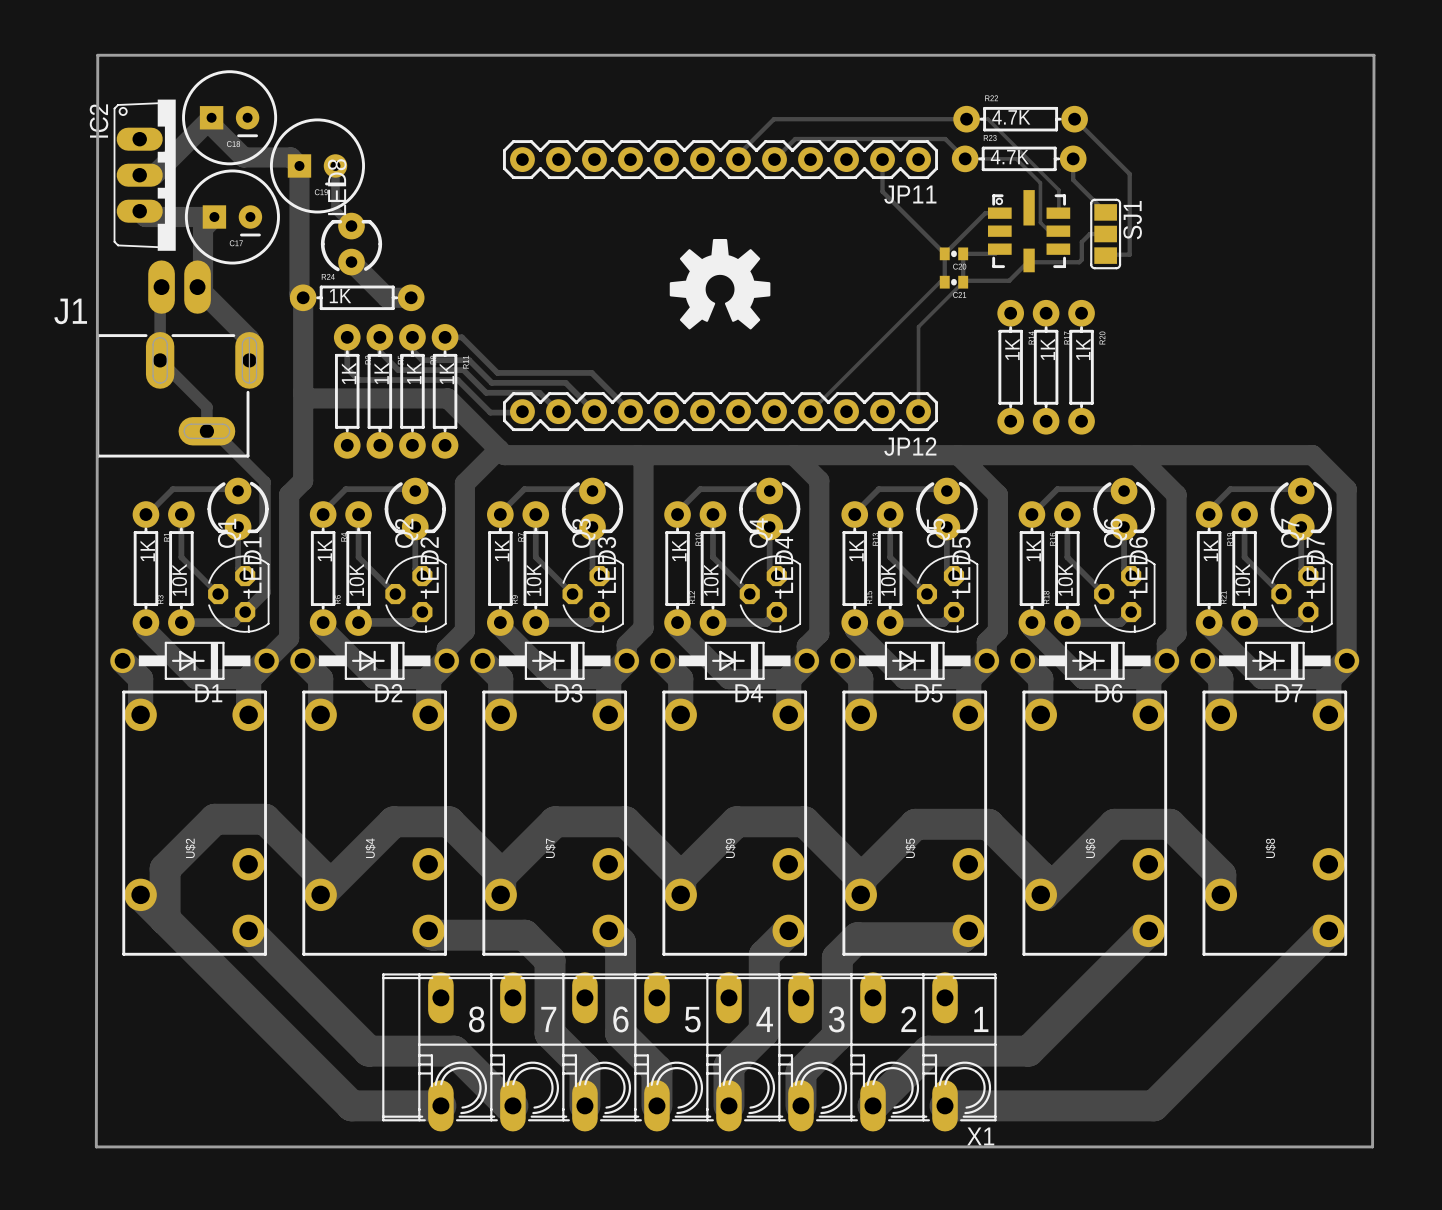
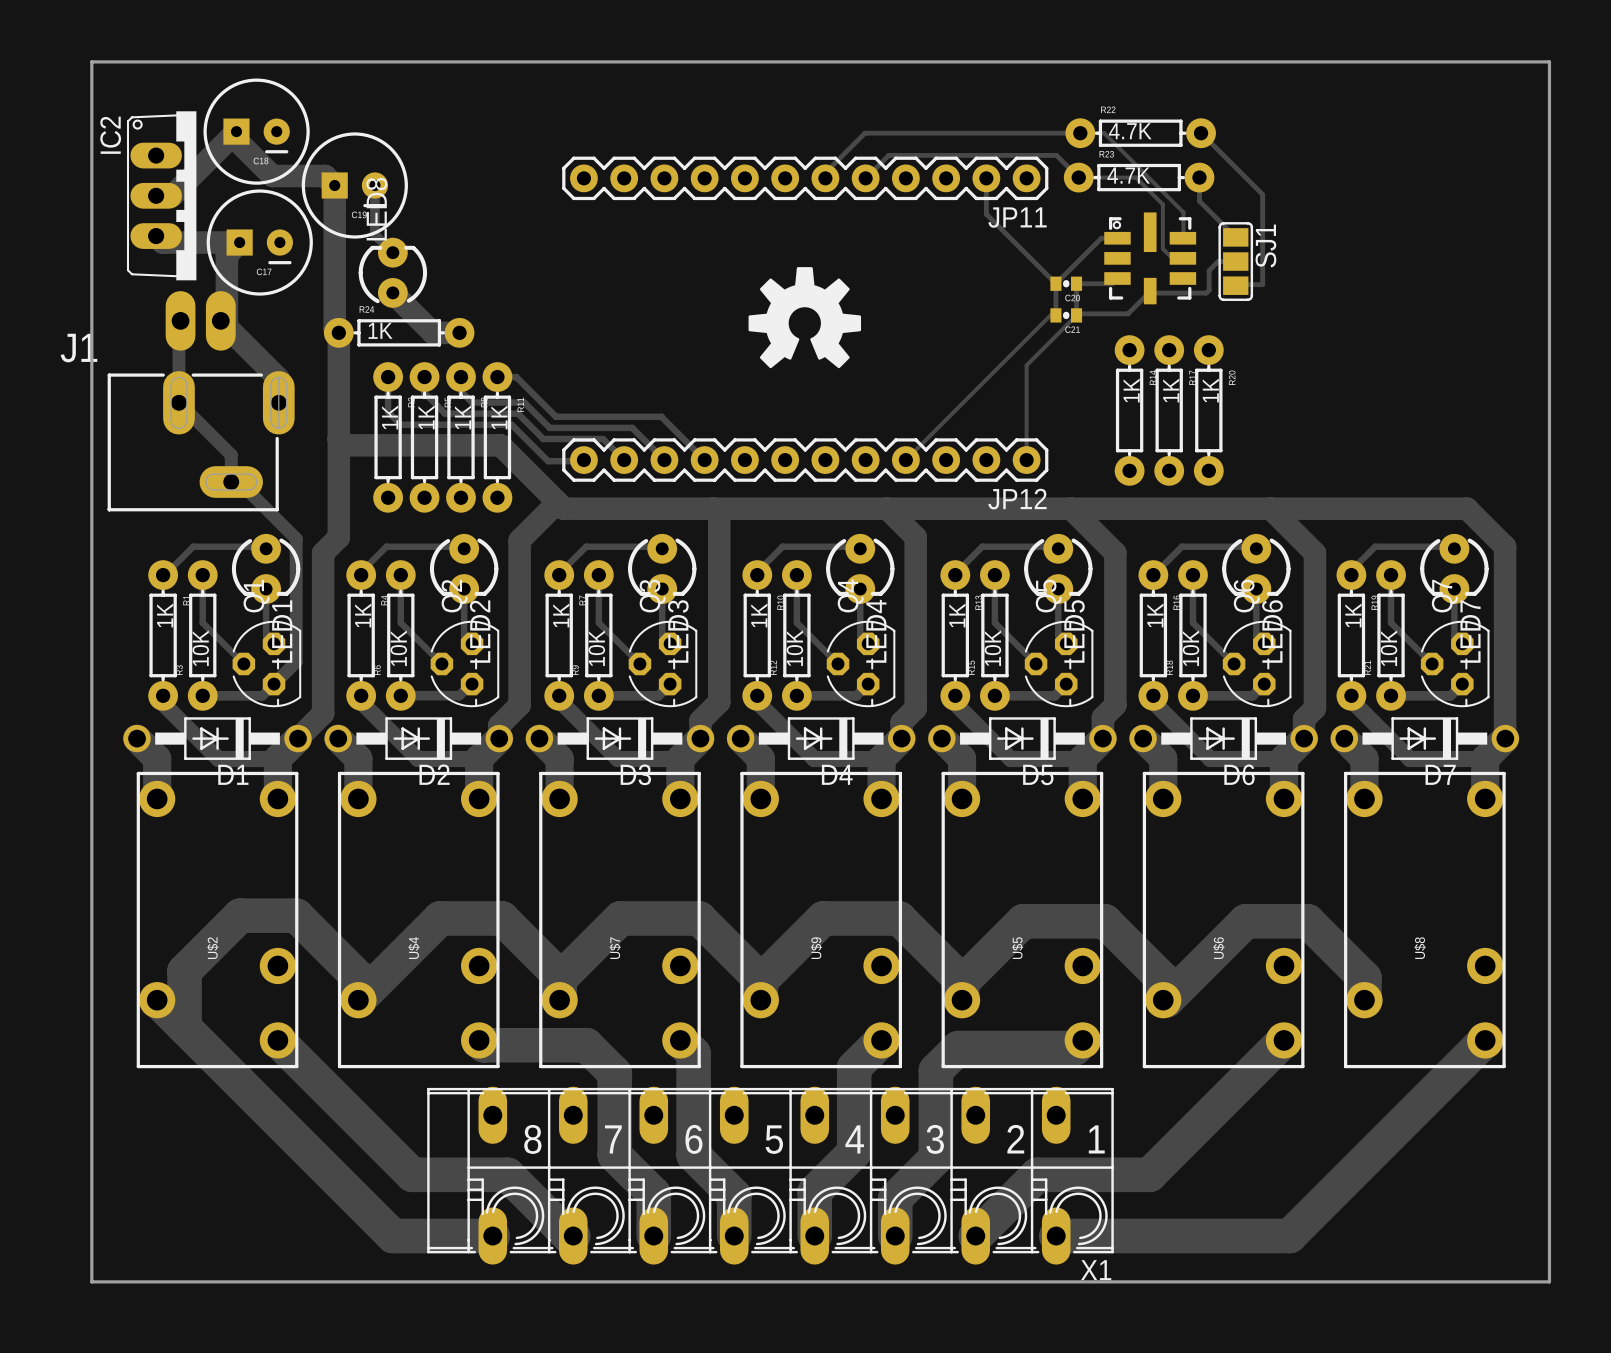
track width: thick (145, 622) (145, 629) (195, 679) (248, 679) -> thin (163, 695) (163, 703) (218, 759) (277, 759)
track width: thick (323, 622) (323, 628) (374, 679) (428, 679) -> thin (361, 695) (361, 702) (418, 759) (478, 759)
track width: thick (500, 622) (500, 626) (552, 679) (608, 679) -> thin (559, 695) (559, 700) (617, 759) (680, 759)
track width: thick (677, 622) (677, 628) (728, 679) (788, 679) -> thin (757, 695) (757, 702) (814, 759) (881, 759)
track width: thick (854, 622) (854, 629) (904, 679) (968, 679) -> thin (955, 695) (955, 703) (1010, 759) (1082, 759)
track width: thick (1031, 622) (1031, 628) (1082, 679) (1148, 679) -> thin (1153, 695) (1153, 702) (1210, 759) (1283, 759)
track width: thick (1209, 622) (1209, 626) (1261, 679) (1328, 679) -> thin (1351, 695) (1351, 700) (1410, 759) (1484, 759)
board edge: (96, 1146) (97, 55) (1373, 55) (1372, 1146) -> (107, 1281) (91, 1281) (91, 61) (1549, 61) (1549, 1281) (1534, 1281)

